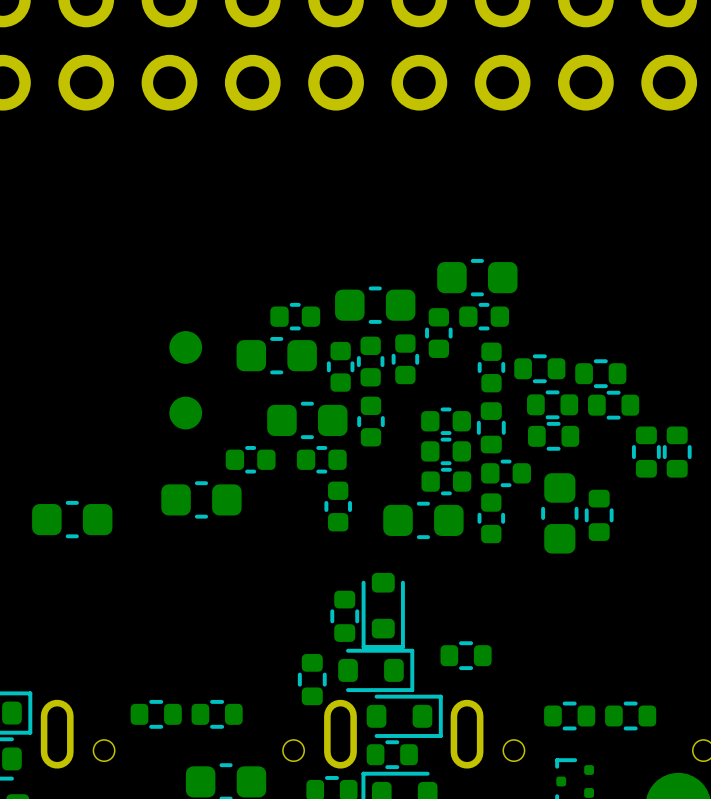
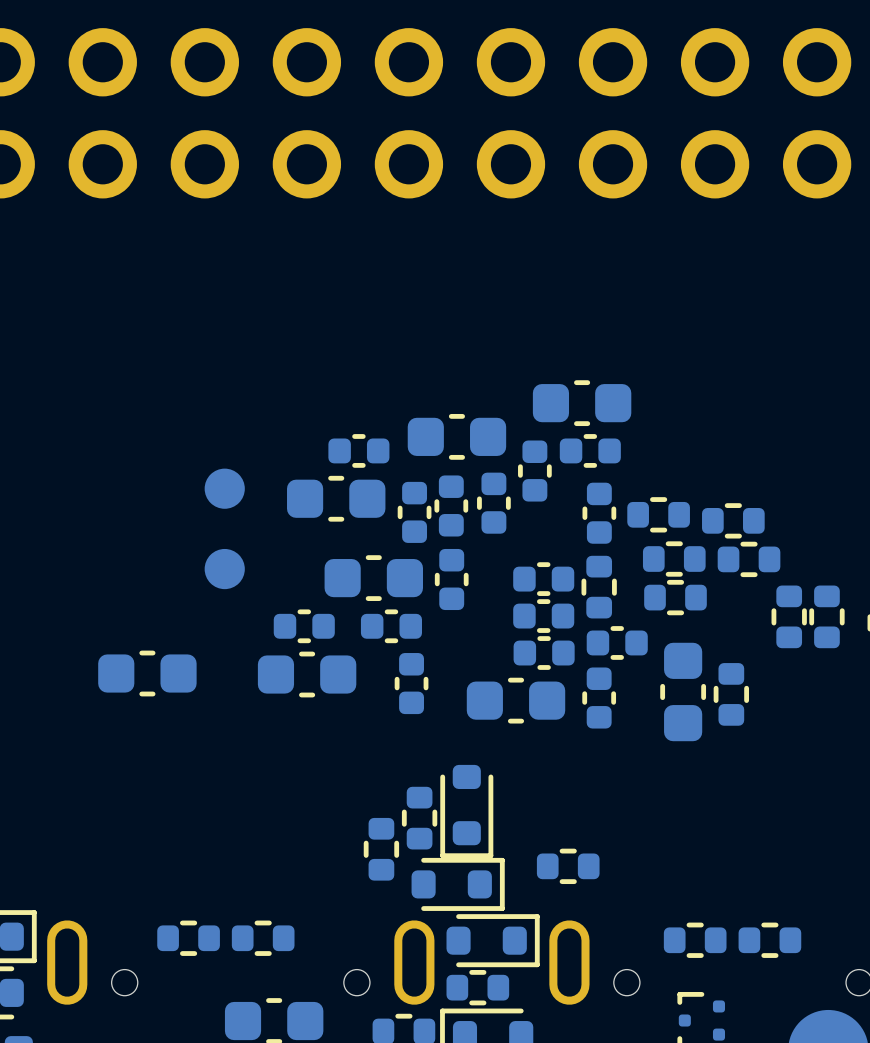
part: none -> (147, 673)
part: (201, 499) -> none
part: none -> (307, 674)
part: (72, 519) -> none
part position: (312, 679) -> (381, 849)

